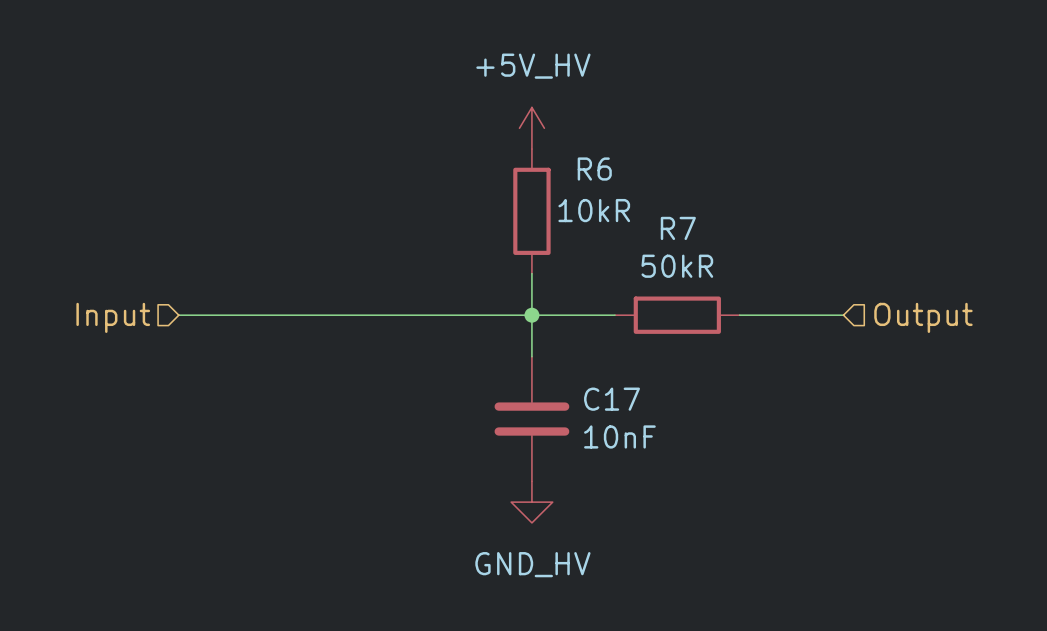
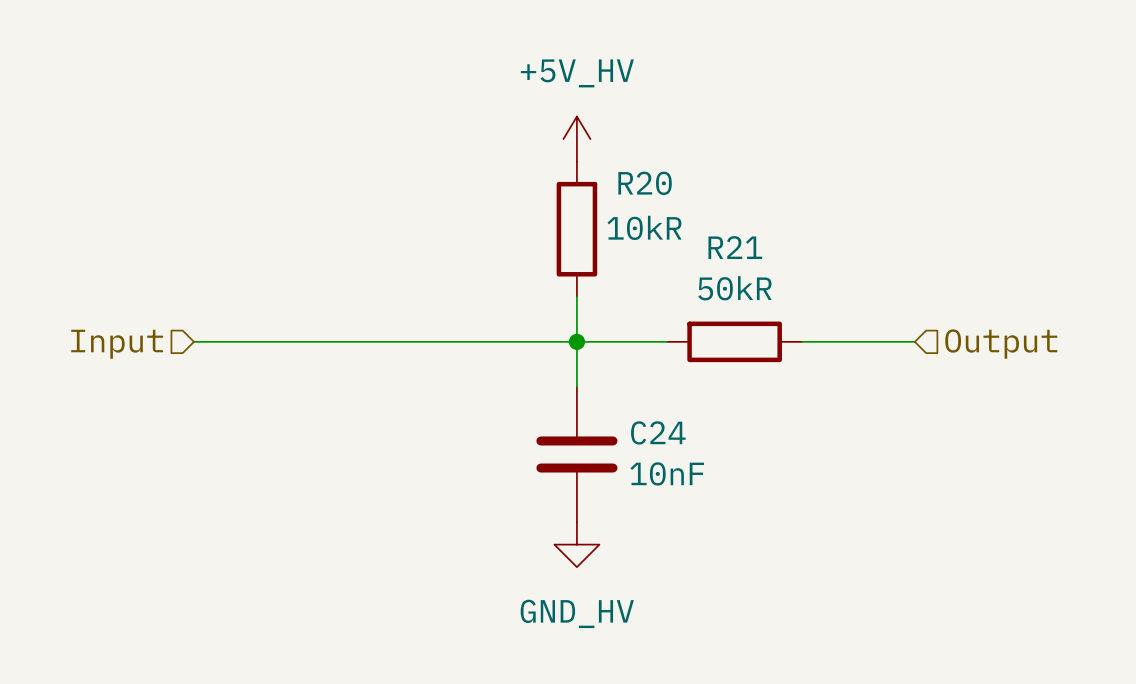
R6 name: R6 (594, 169) -> R20 (645, 183)
R7 name: R7 (678, 228) -> R21 (735, 247)
C17 name: C17 (612, 399) -> C24 (658, 432)

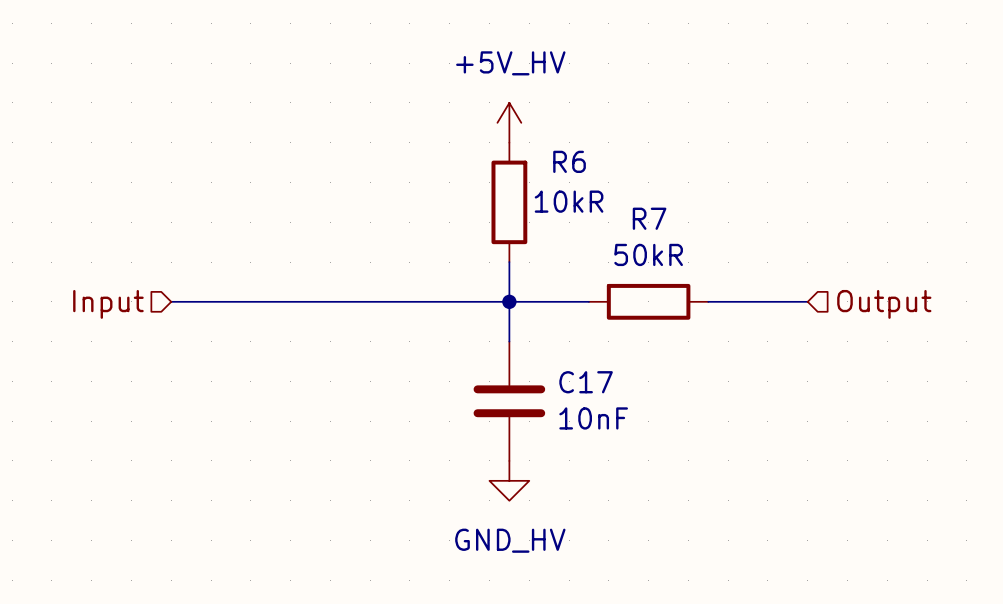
R20 name: R20 (645, 183) -> R6 (569, 161)
R21 name: R21 (735, 247) -> R7 (649, 218)
C24 name: C24 (658, 432) -> C17 (586, 382)

